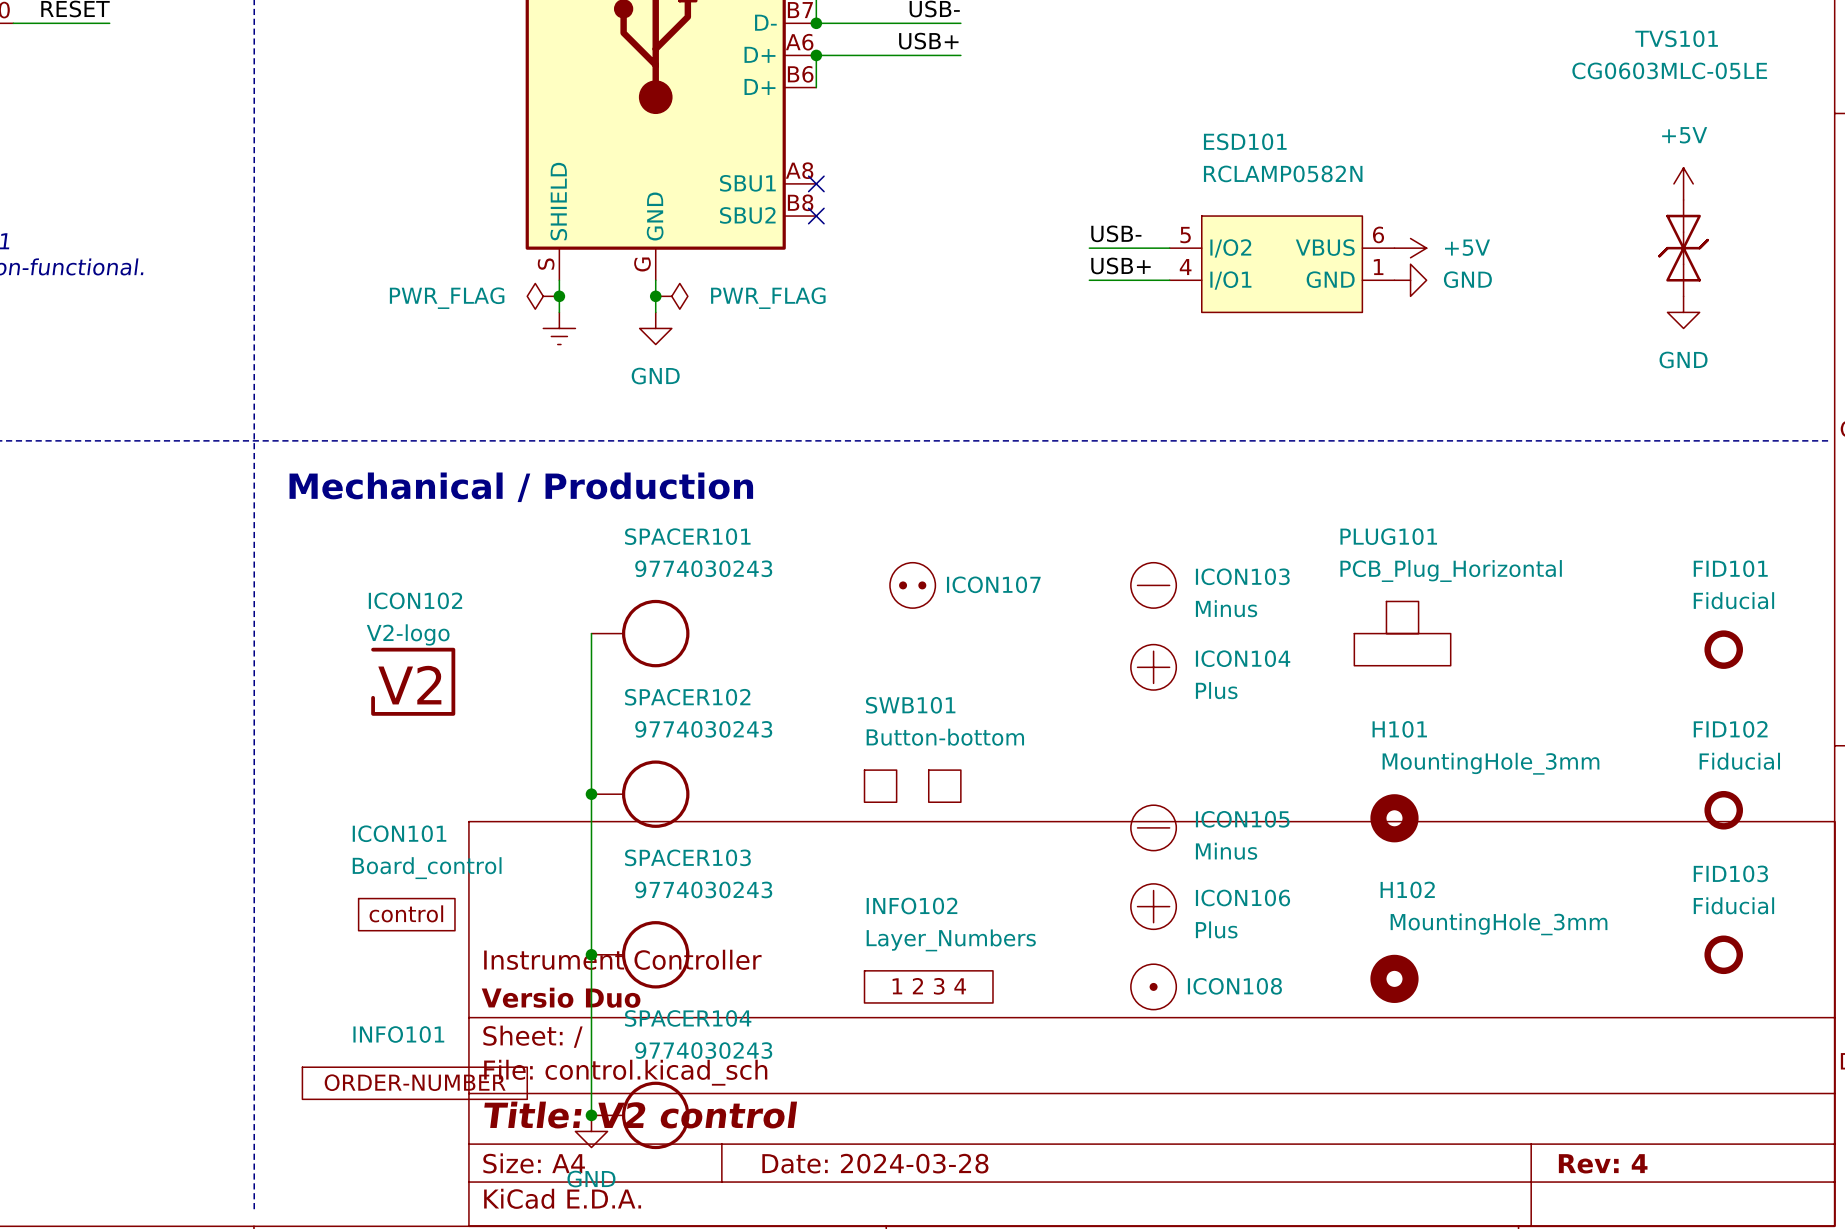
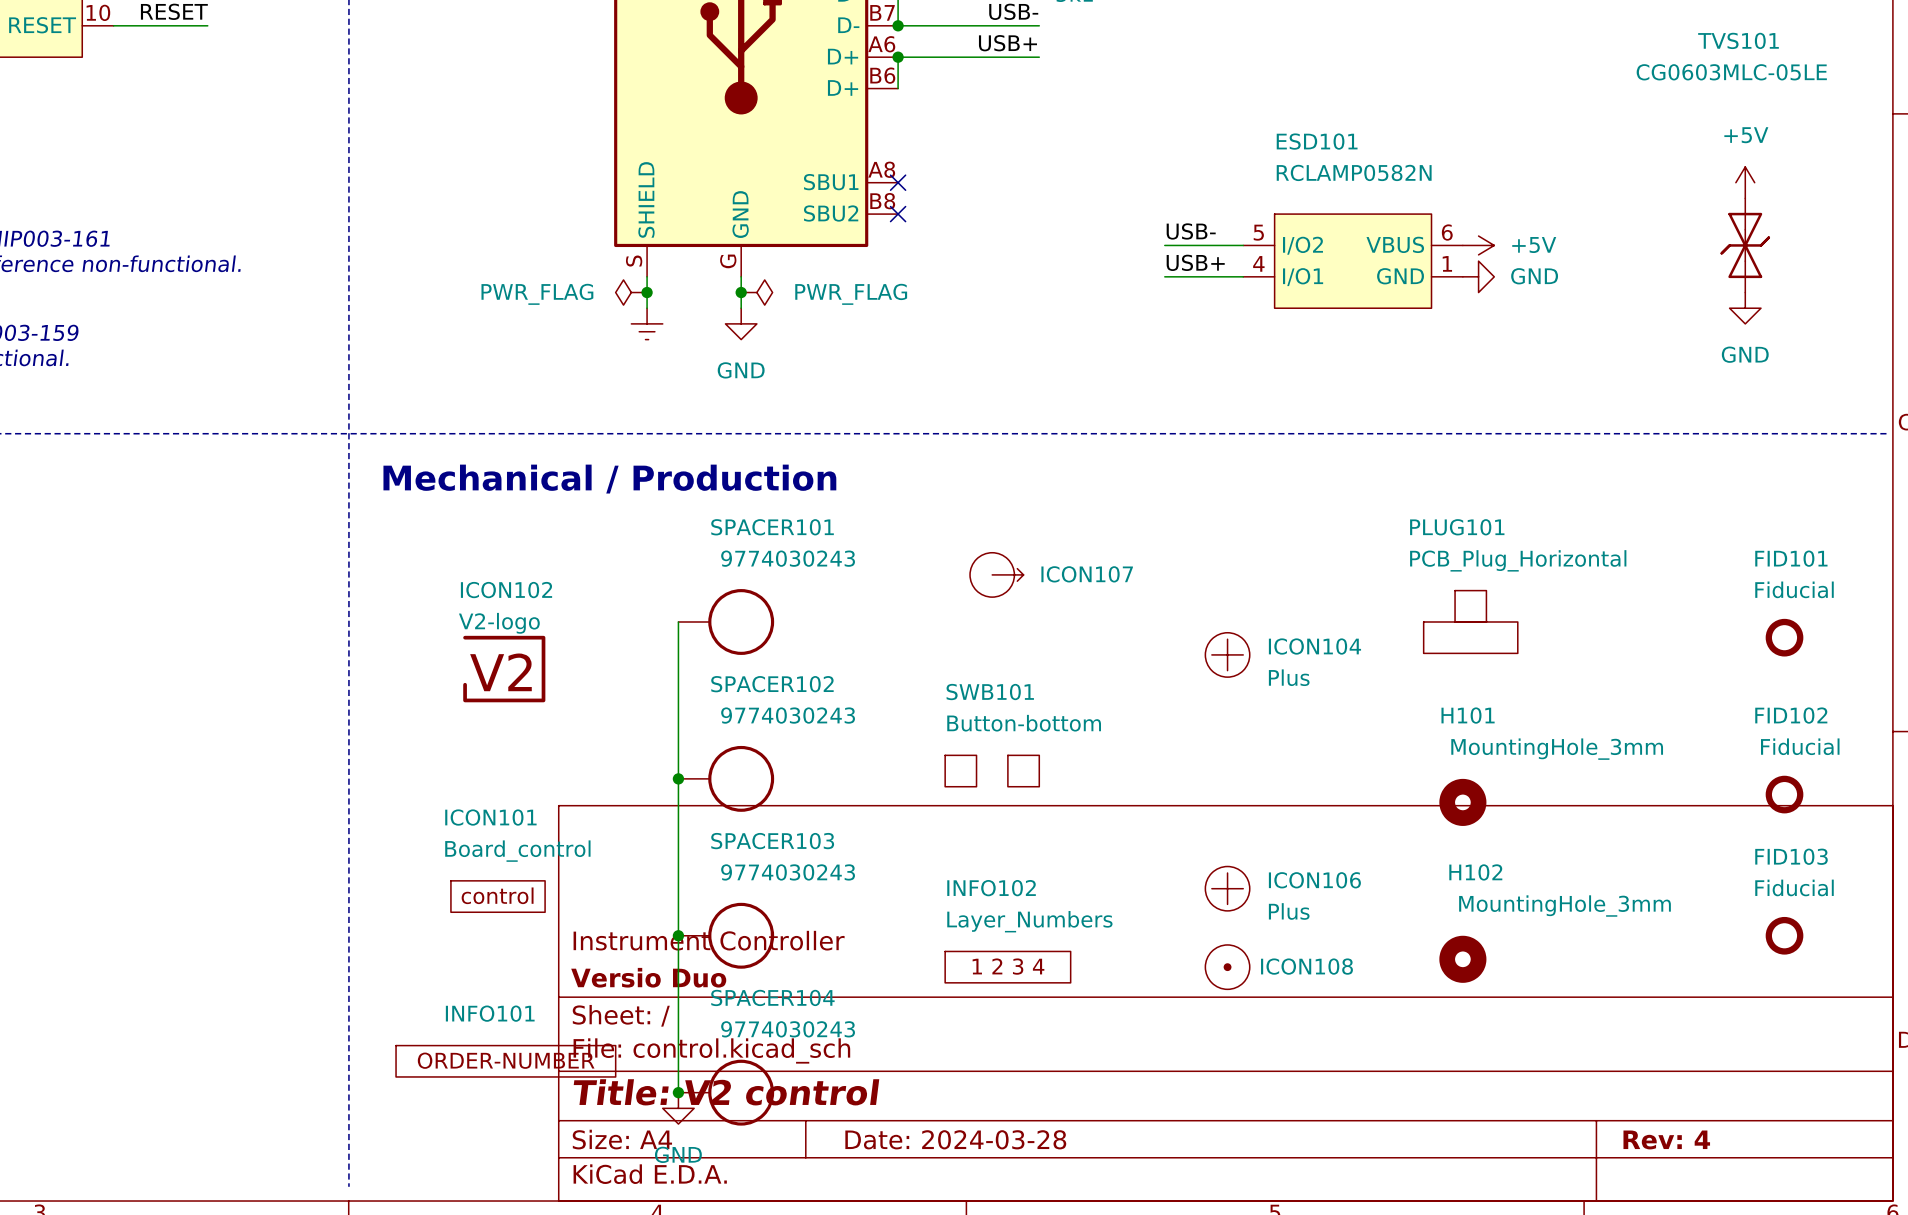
ICON107 symbol: [889, 562, 936, 609] -> [970, 552, 1024, 598]
ICON107 name position: ICON107 (993, 584) -> ICON107 (1087, 574)
ICON103: Minus (1153, 585) -> none
ICON105: Minus (1153, 827) -> none

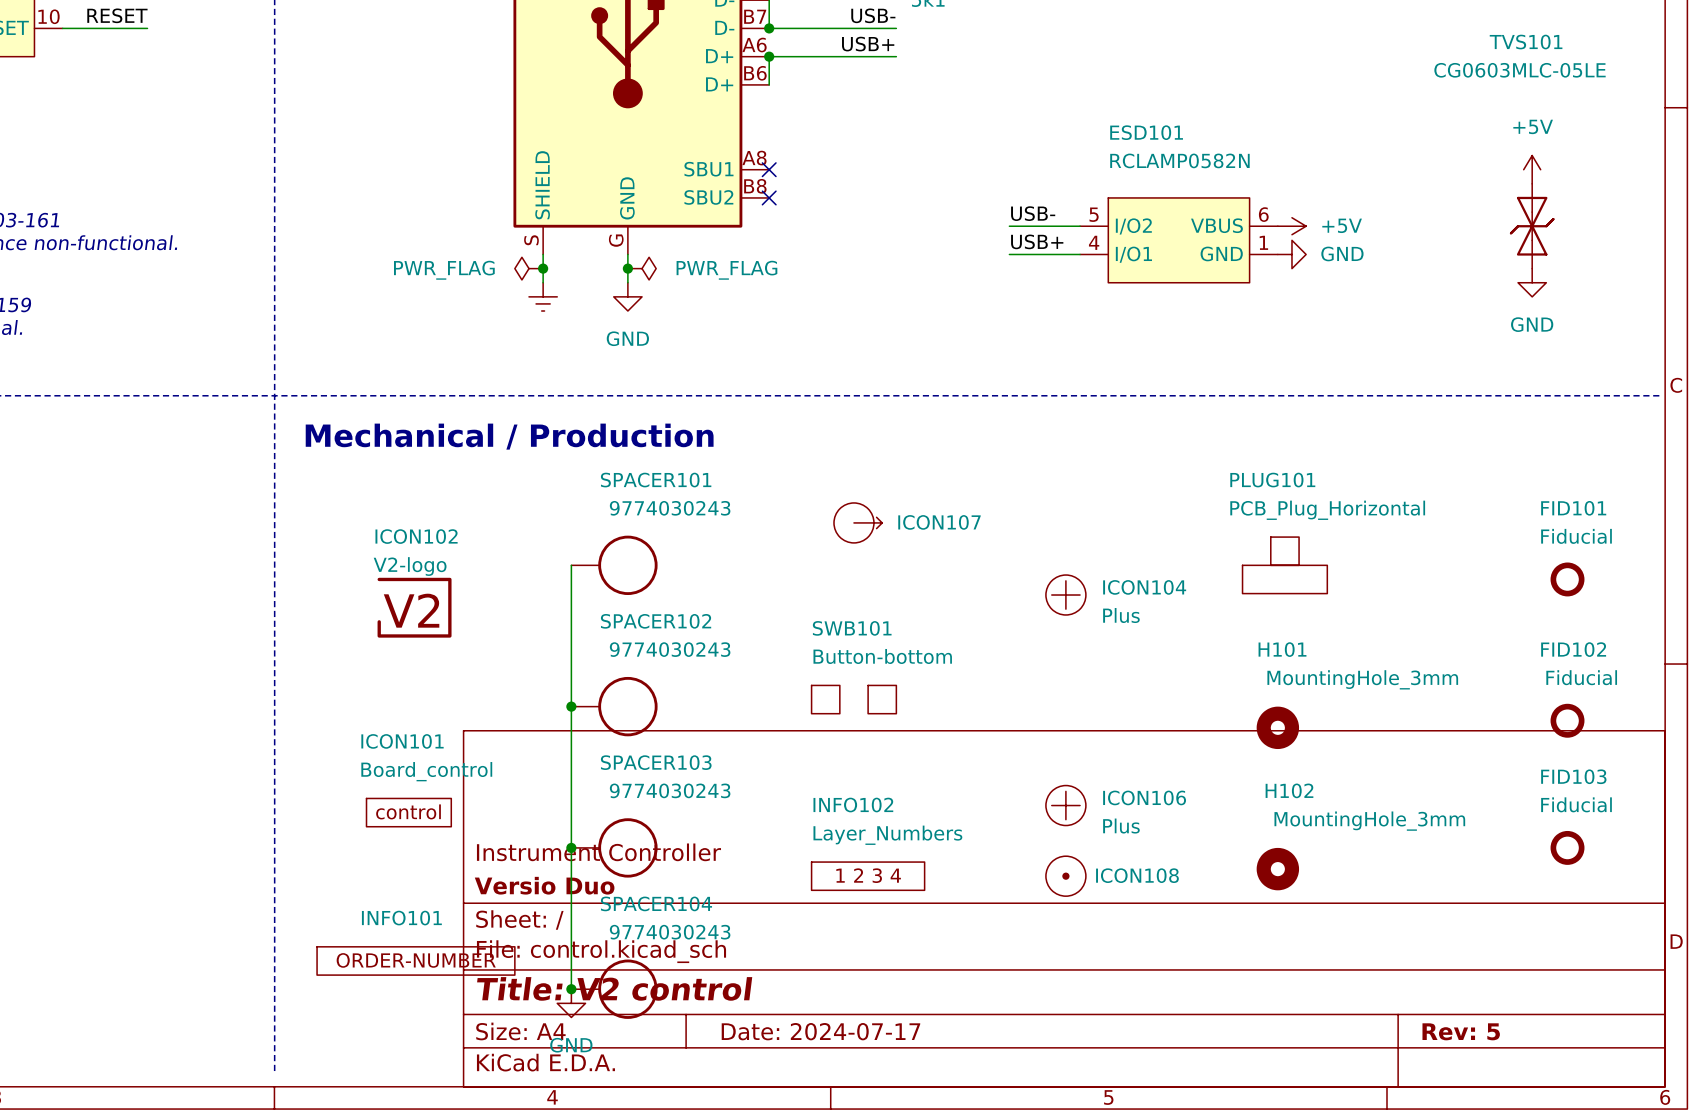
title block: Date: 2024-03-28 (955, 1139) -> Date: 2024-07-17 (820, 1031)
title block: Rev: 4 (1666, 1139) -> Rev: 5 (1461, 1031)

